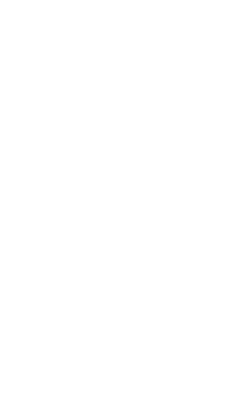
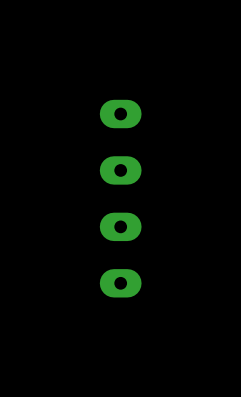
part: none -> (120, 198)

